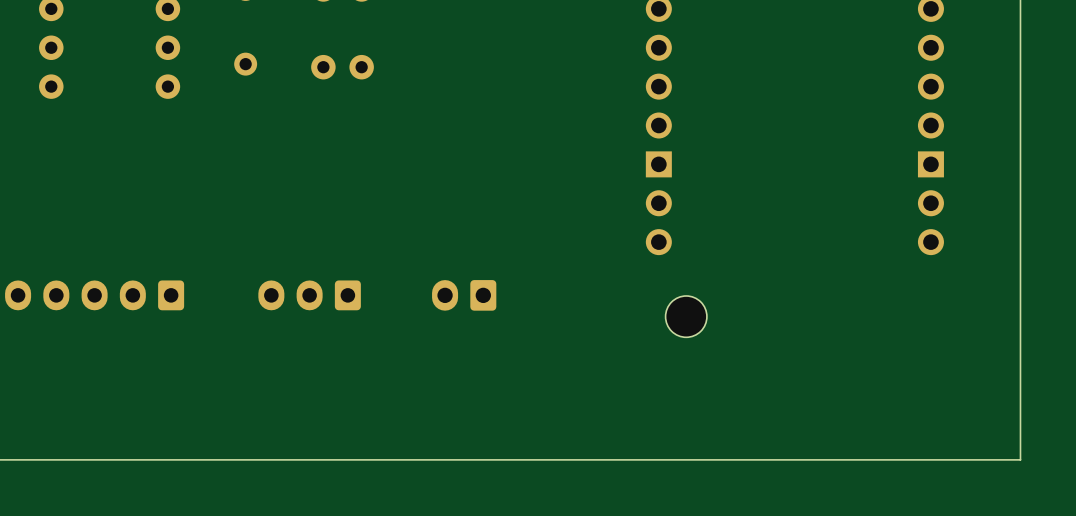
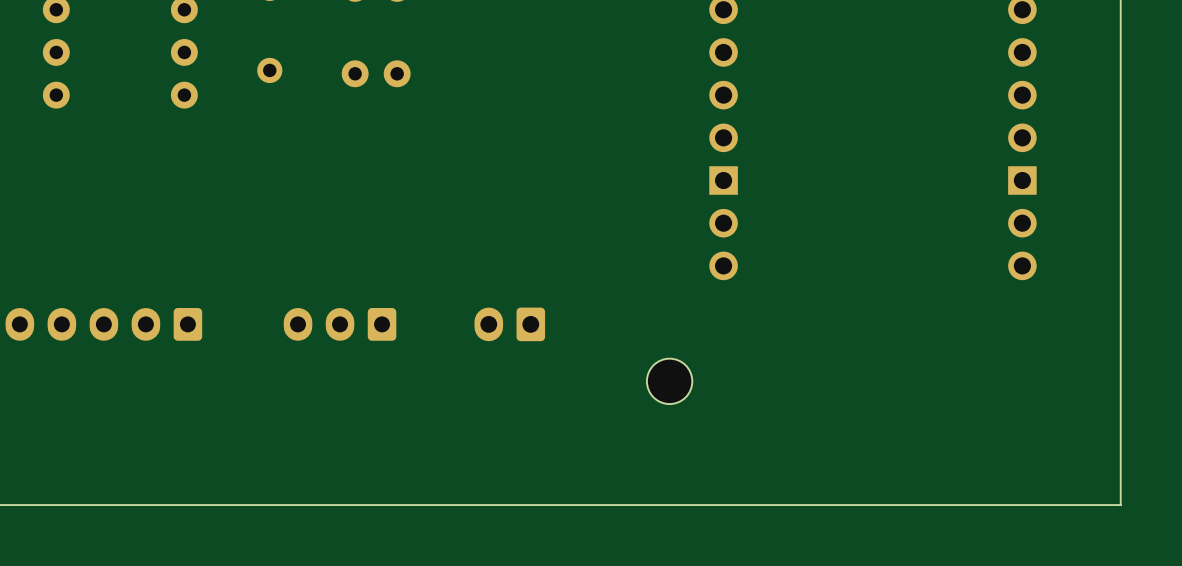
part position: (686, 316) -> (669, 381)

